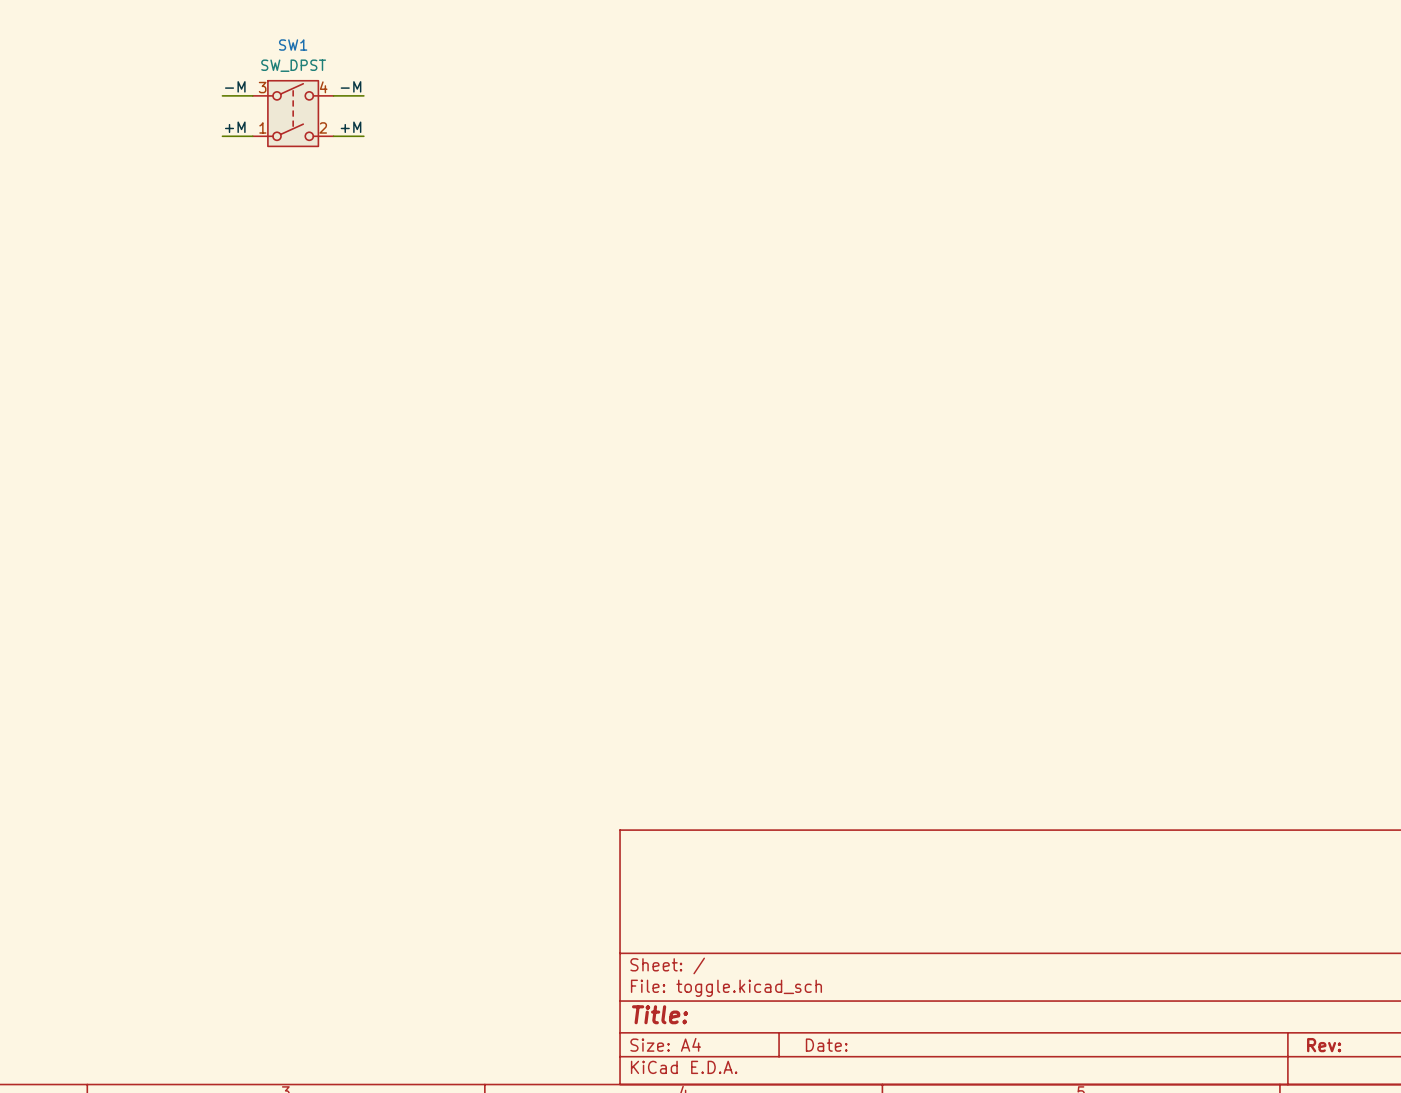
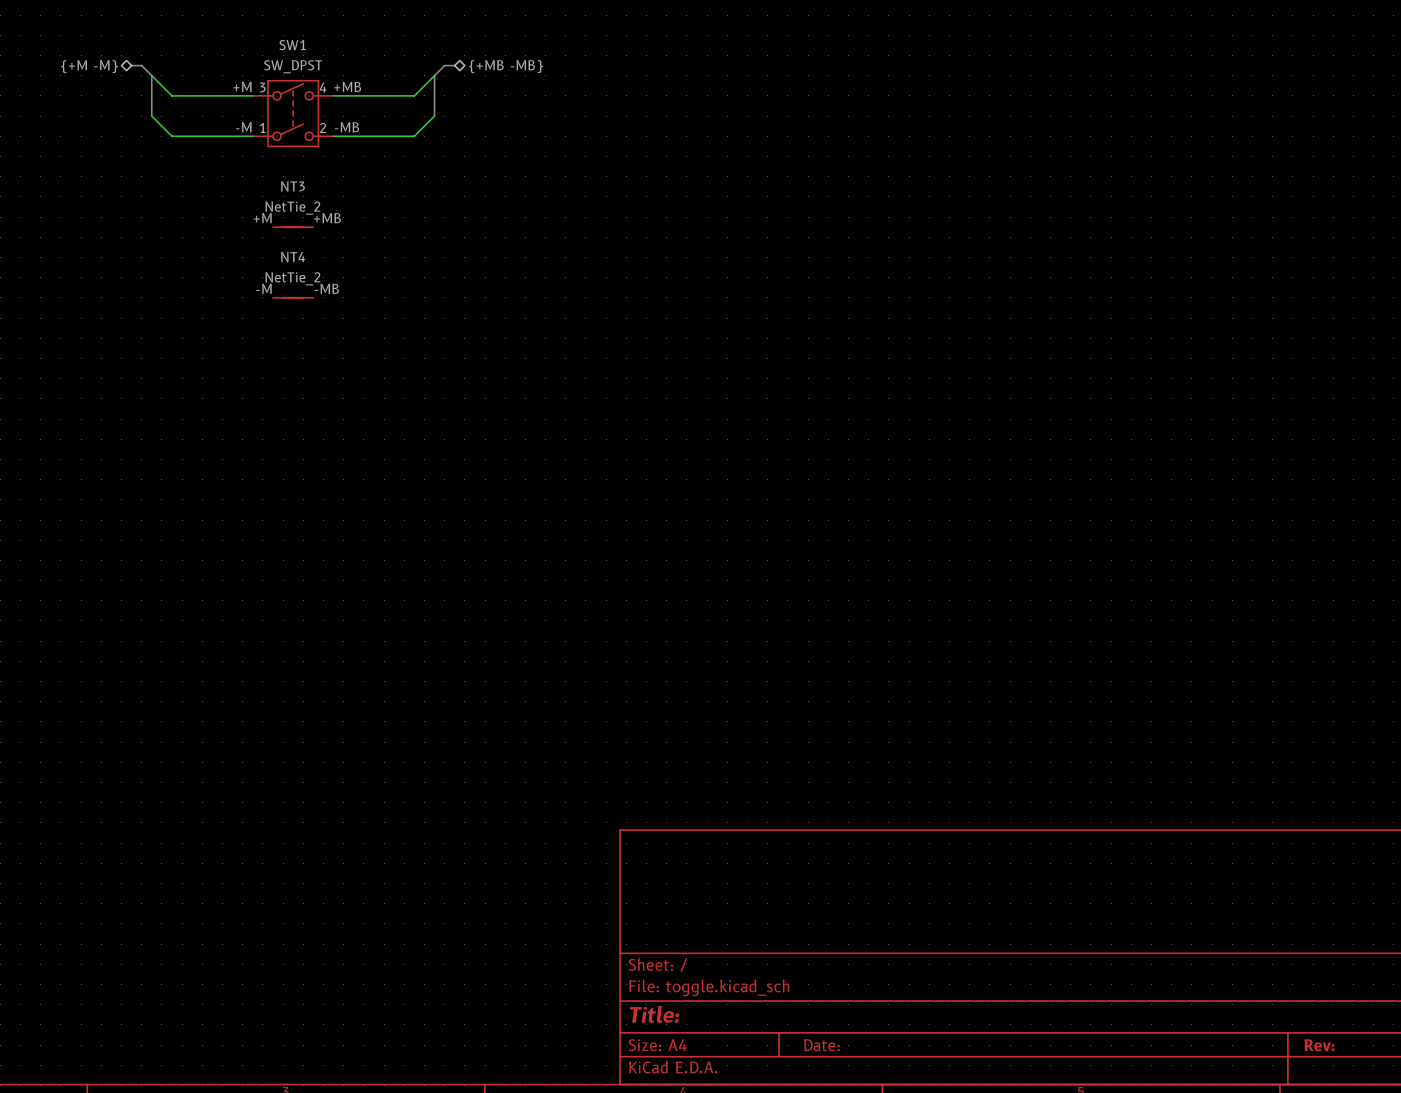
bus: none -> (131, 65) (141, 65) (151, 75) (151, 116)
bus: none -> (454, 65) (444, 65) (434, 75) (434, 116)
hierarchical label: none -> {+M -M} (89, 66)
hierarchical label: none -> {+MB -MB} (506, 66)
wire: none -> (151, 75) (171, 95) (222, 95)
wire: none -> (434, 75) (414, 95) (363, 95)
label position: -M (235, 86) -> -M (243, 127)
label: -M (351, 86) -> none
label: none -> +MB (347, 86)
wire: none -> (151, 116) (171, 136) (222, 136)
wire: none -> (434, 116) (414, 136) (363, 136)
label position: +M (235, 127) -> +M (242, 86)
label: +M (351, 127) -> none
label: none -> -MB (346, 127)
label: none -> +M (262, 218)
label: none -> +MB (327, 218)
NT3: none -> NetTie_2 (293, 227)
label: none -> -M (264, 288)
label: none -> -MB (326, 288)
NT4: none -> NetTie_2 (293, 297)

